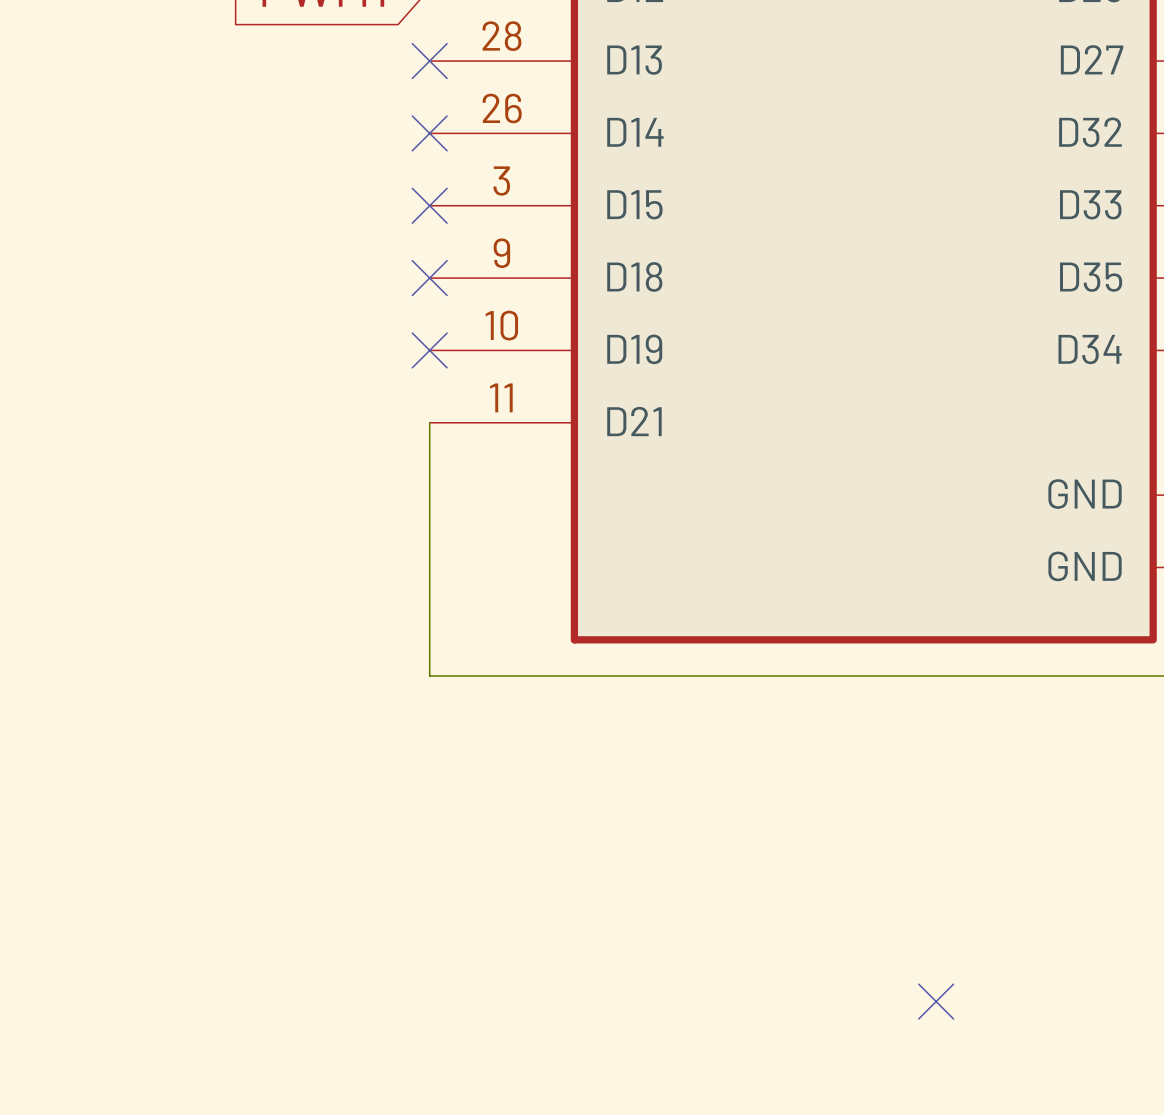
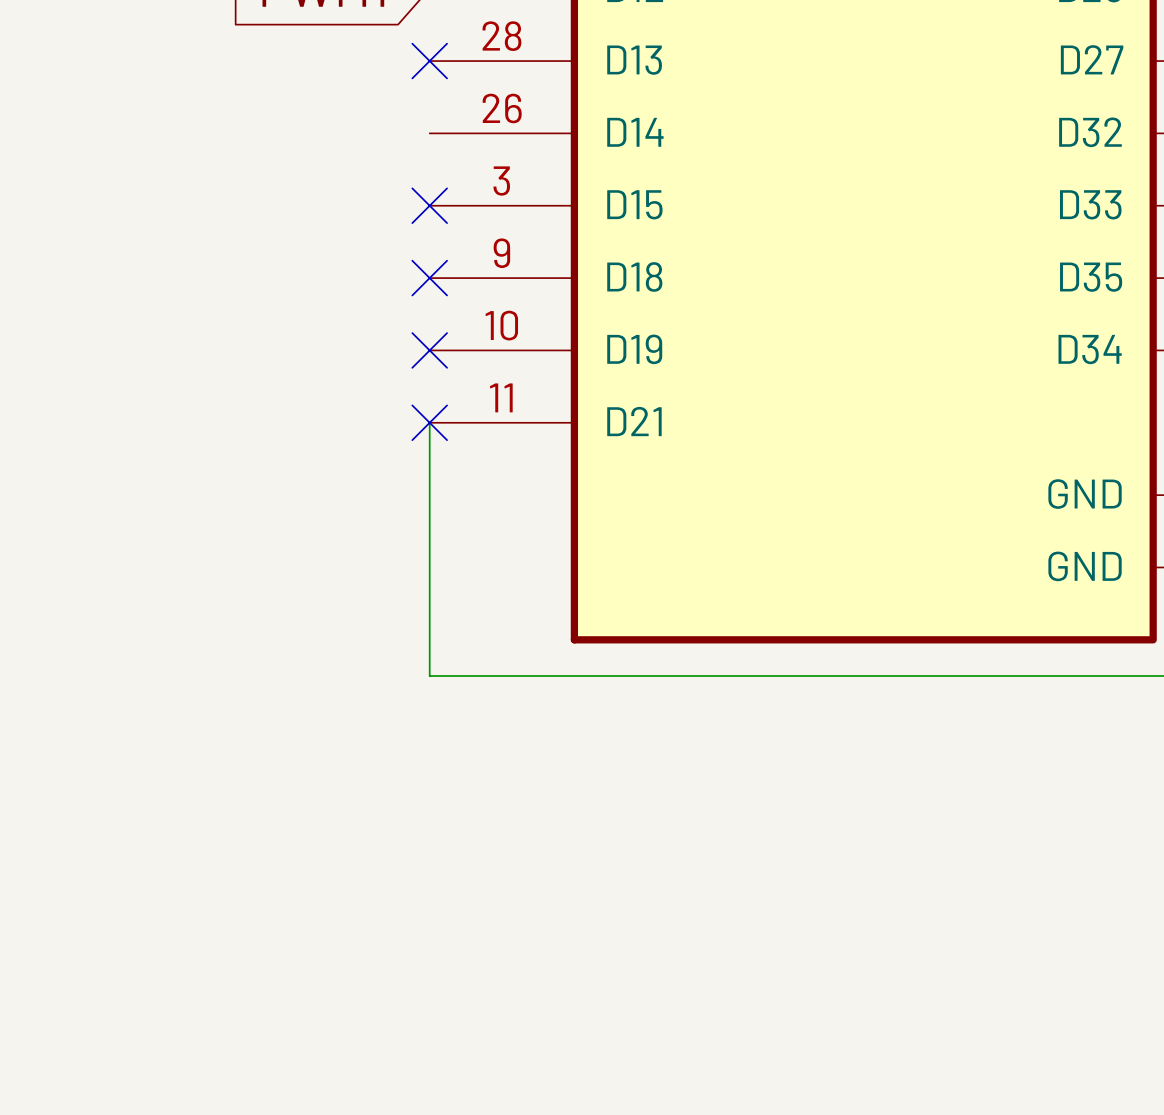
no-connect mark: (429, 133) -> none
no-connect mark: none -> (429, 422)
no-connect mark: (936, 1001) -> none

